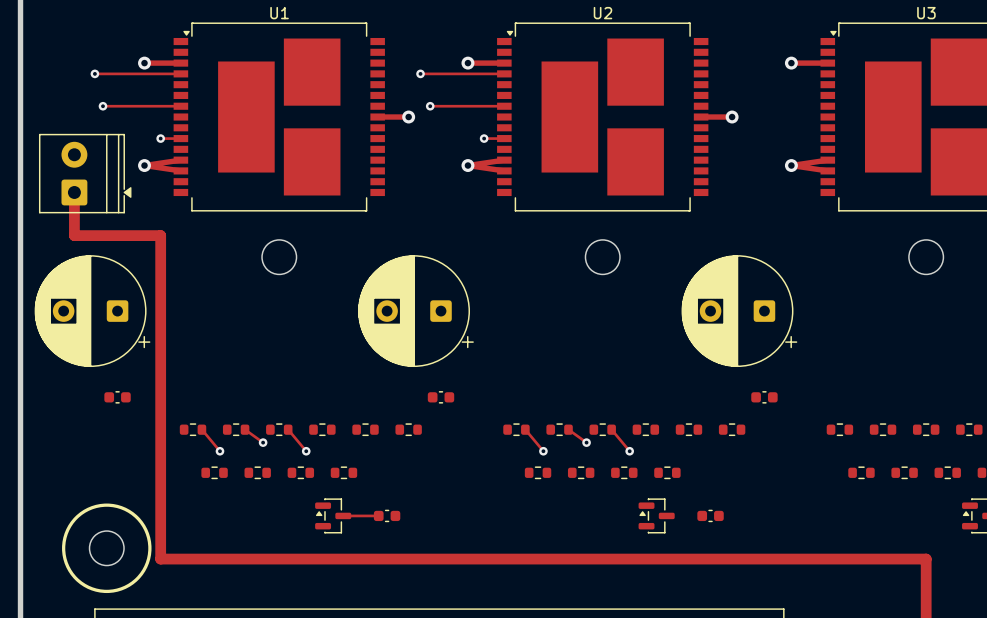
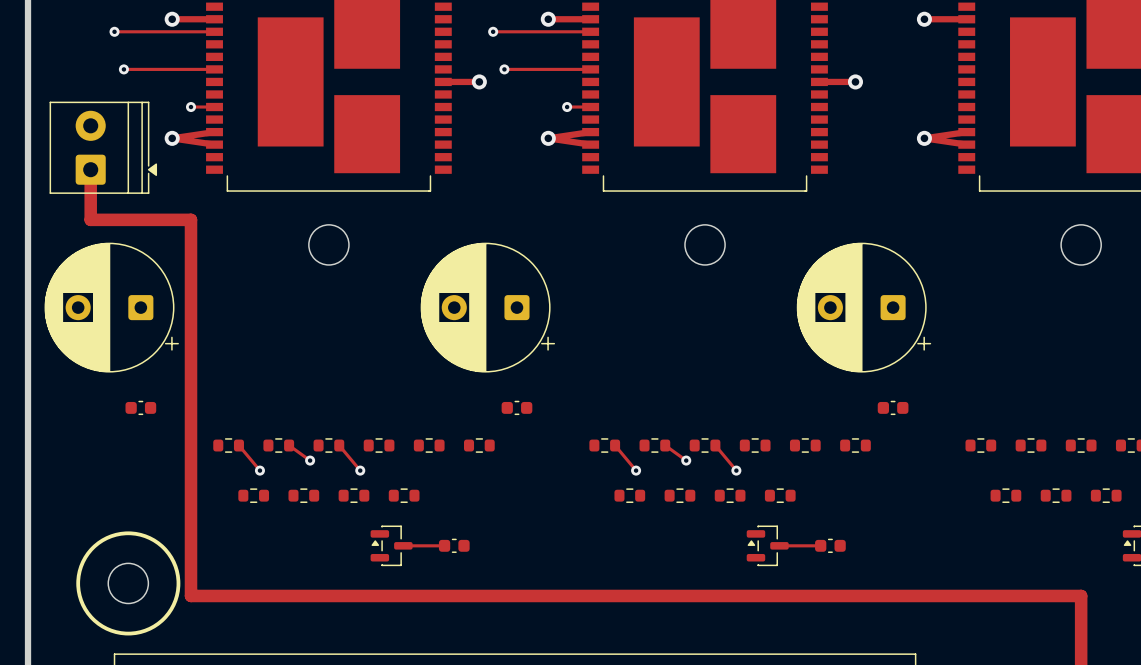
track: none -> (779, 545) (820, 545)

